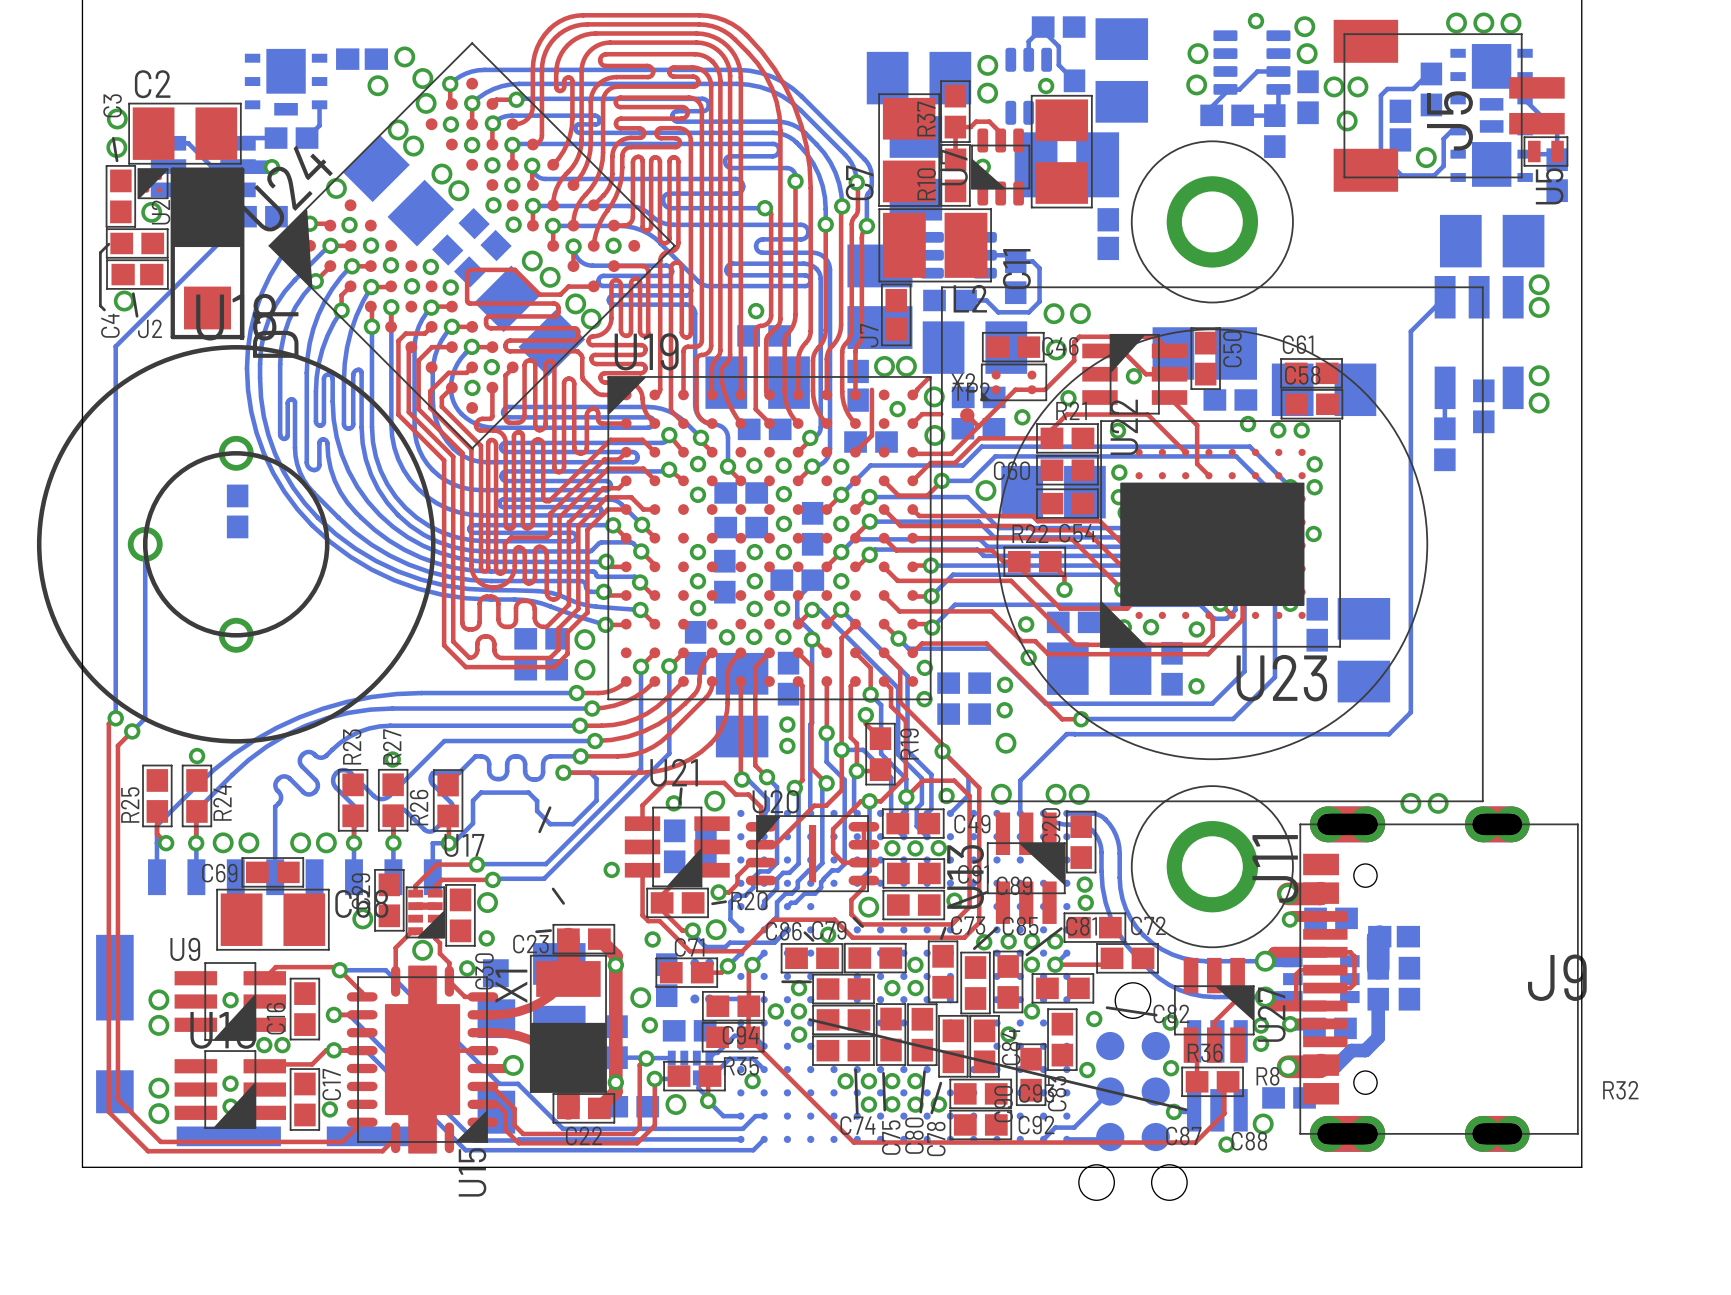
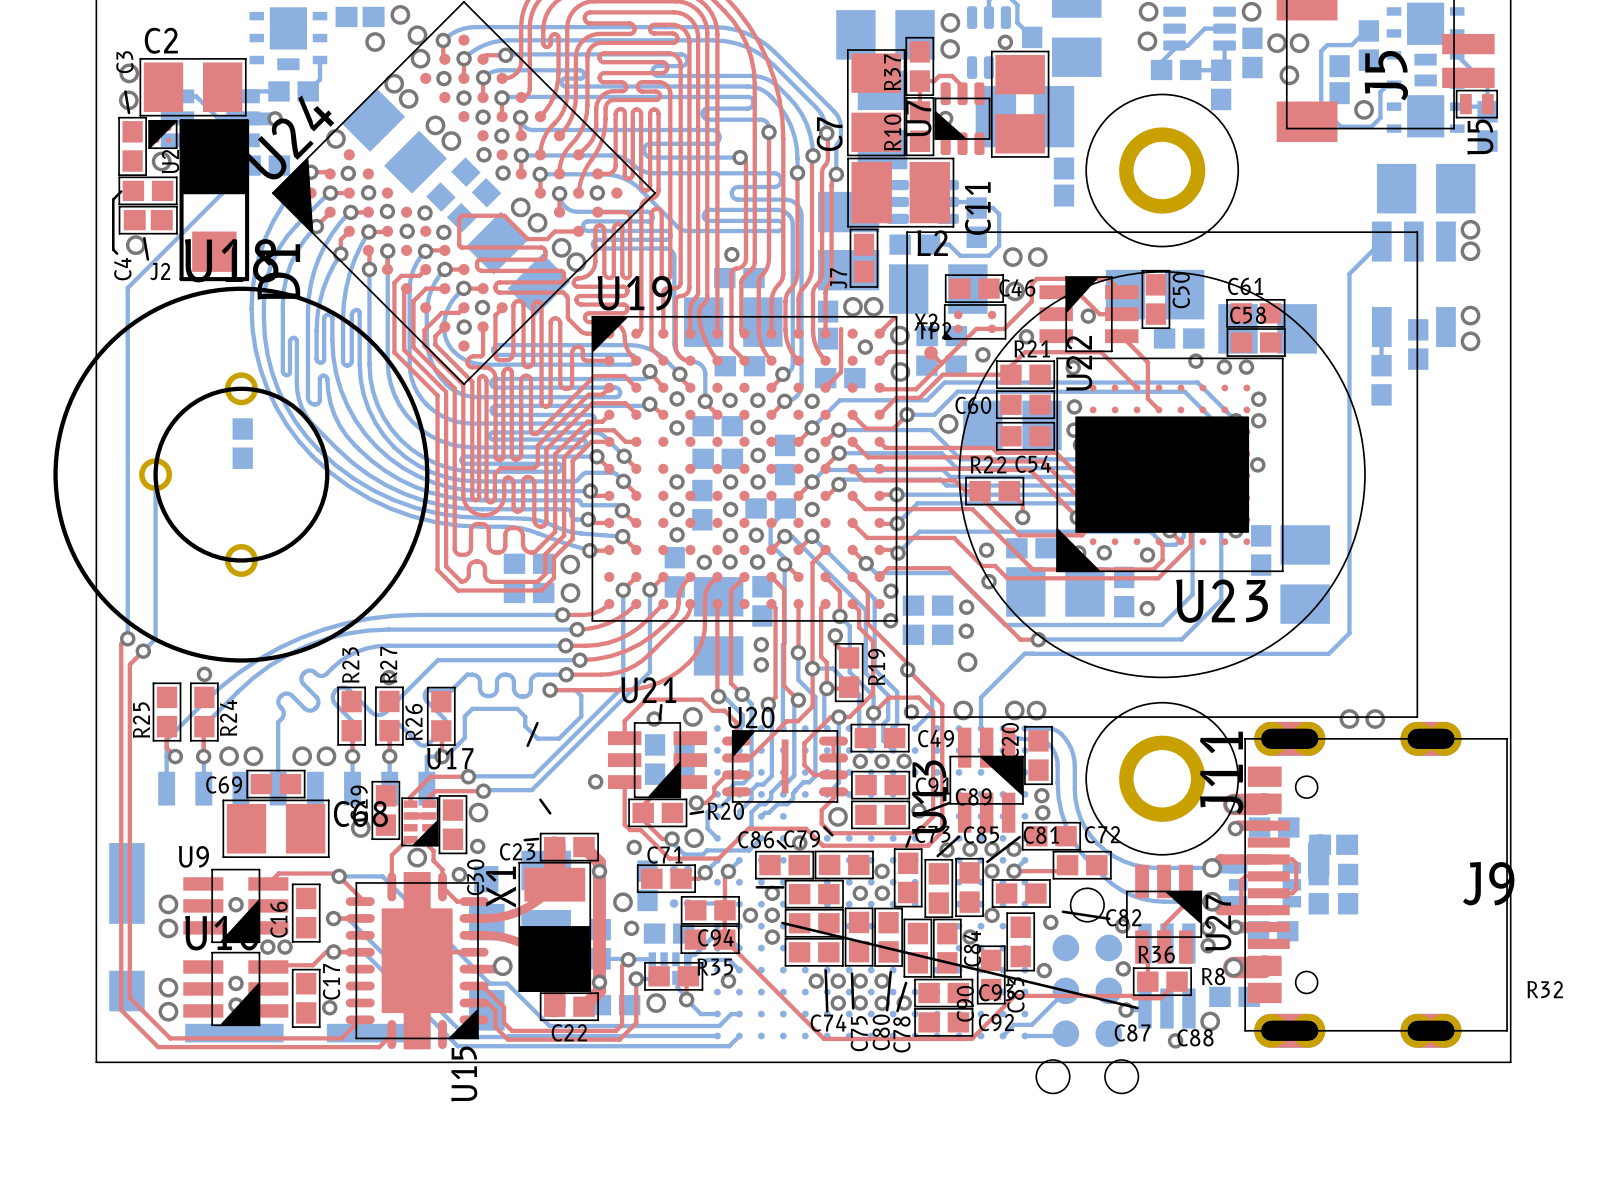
bottom track: (1378, 999) (1378, 1037) (1365, 1050) (1351, 1050) (1335, 1066) (1288, 1066) -> none
top track: (1224, 1085) (1224, 1113) (1195, 1142) (1010, 1142) -> (1173, 985) (1161, 998) (1134, 998) (1132, 995) (1014, 995) (971, 1038)

